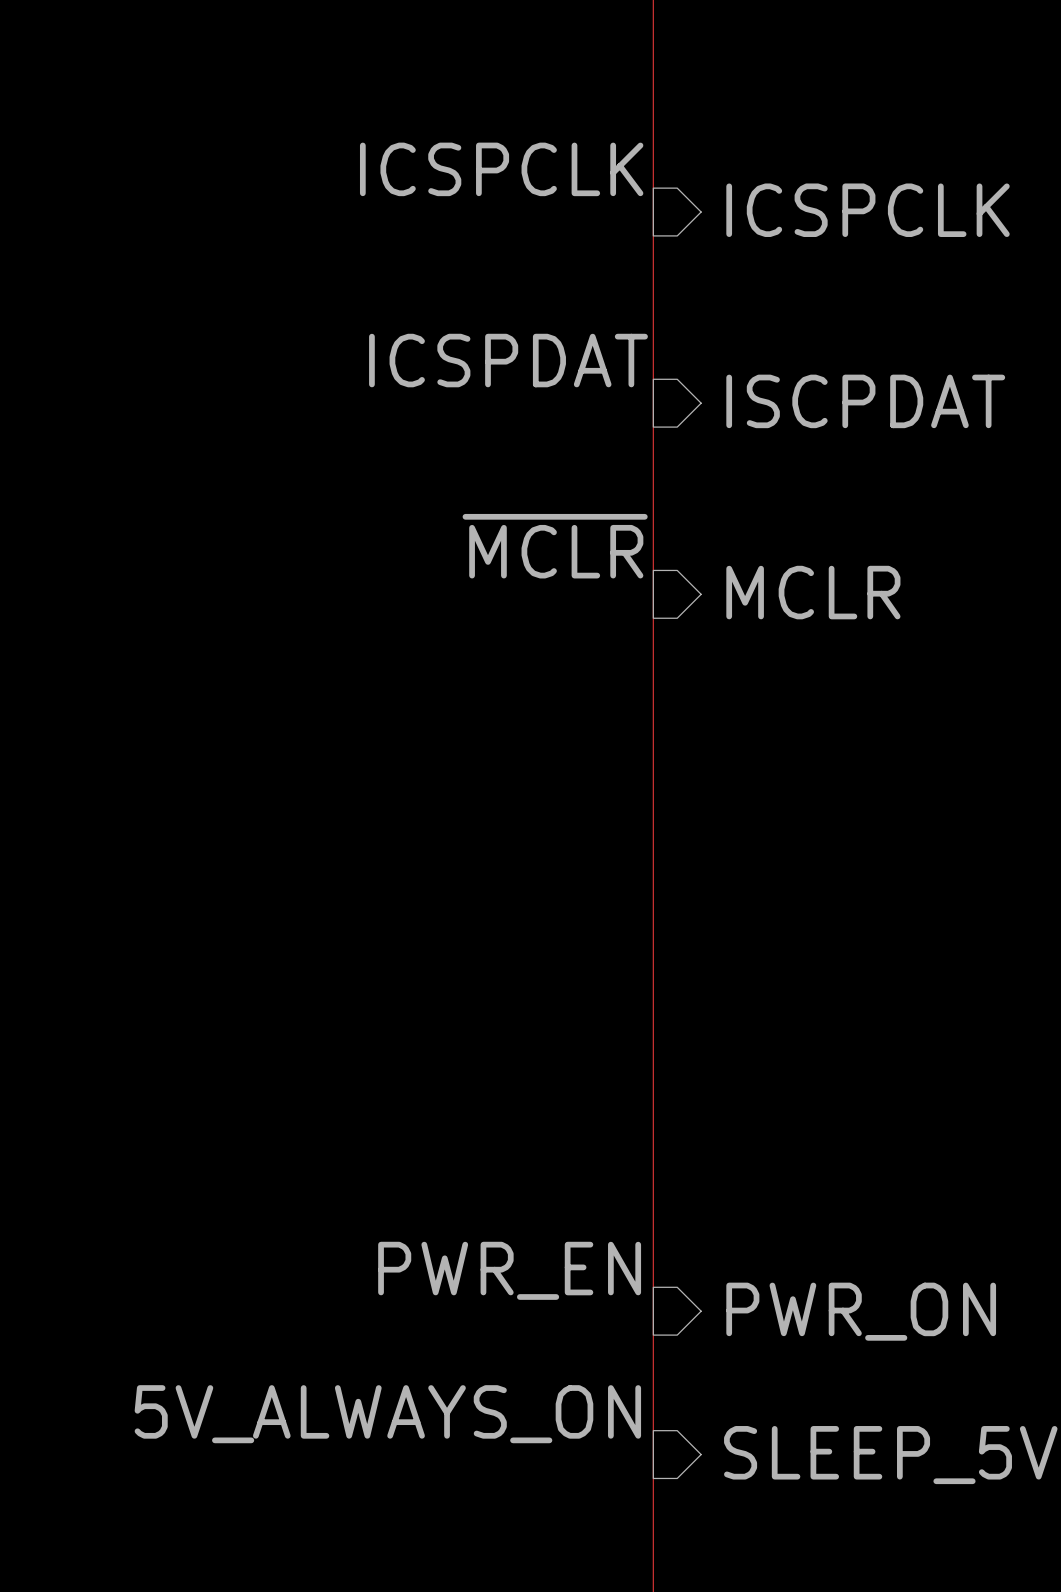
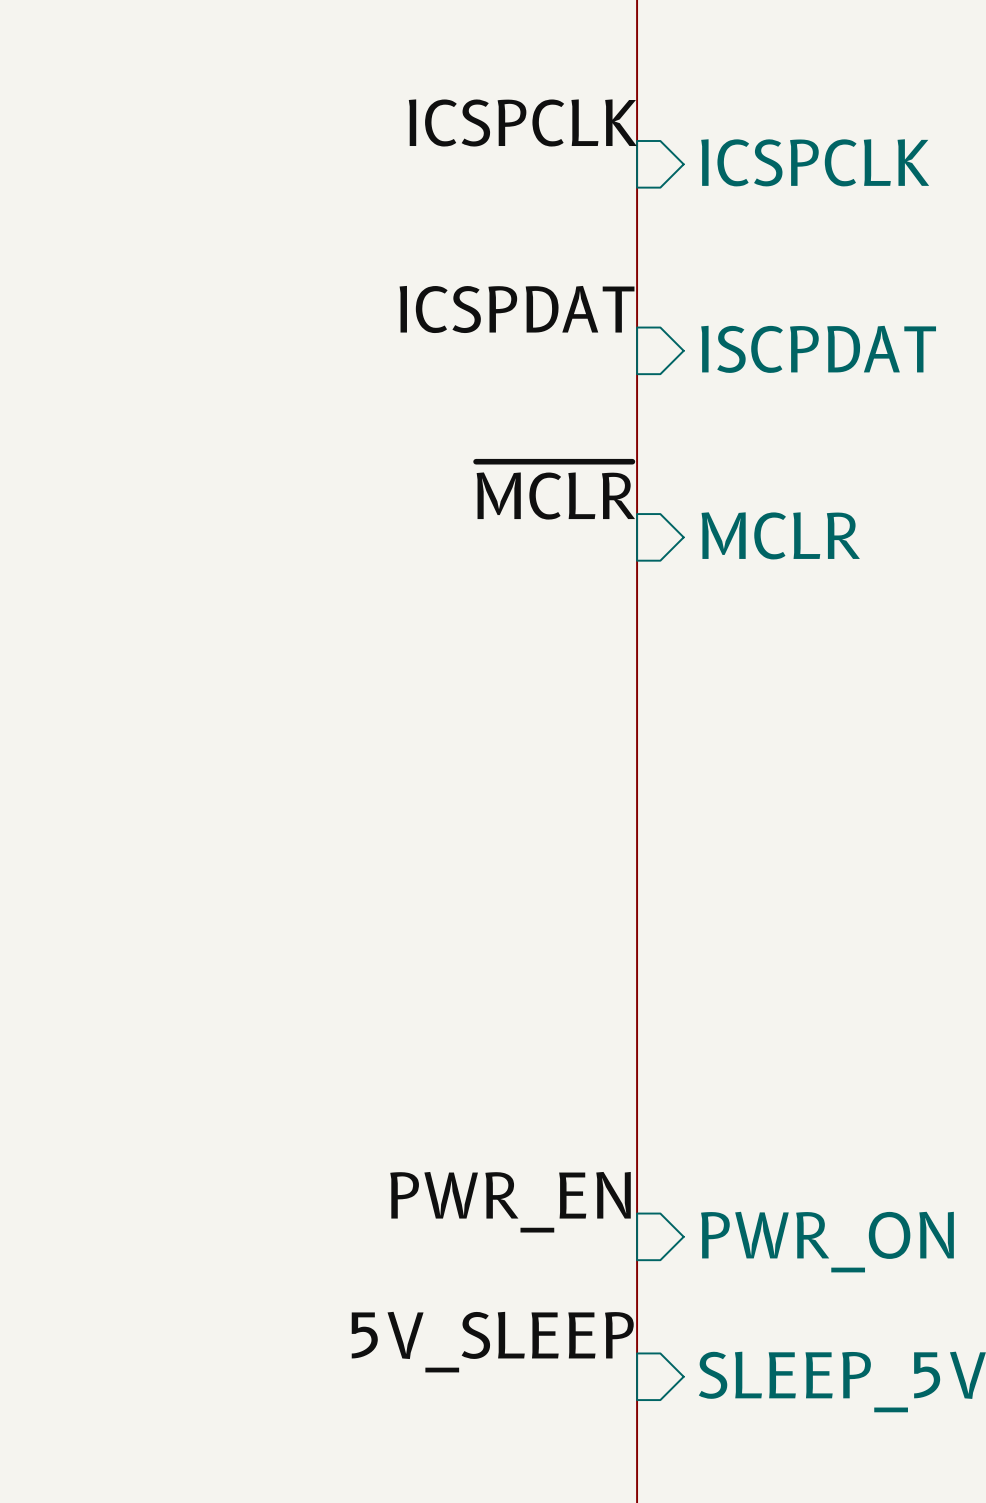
label: 5V_ALWAYS_ON (387, 1414) -> 5V_SLEEP (492, 1342)

